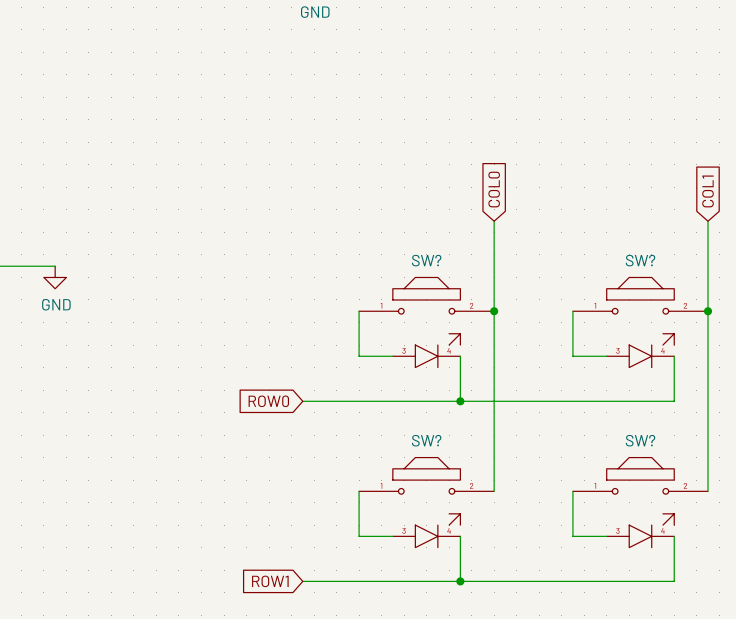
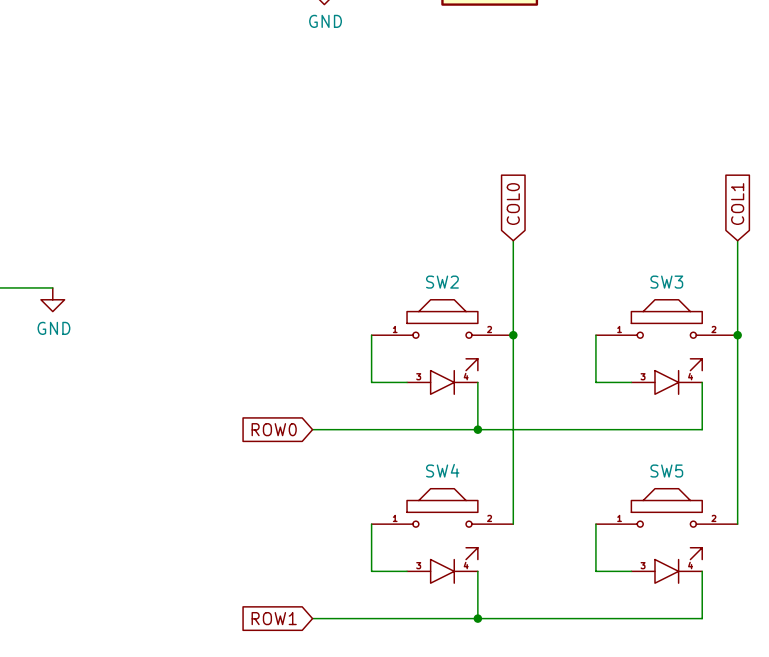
SW? name: SW? (426, 260) -> SW2 (442, 282)
SW? name: SW? (640, 260) -> SW3 (666, 282)
SW? name: SW? (426, 440) -> SW4 (442, 470)
SW? name: SW? (640, 440) -> SW5 (666, 471)

